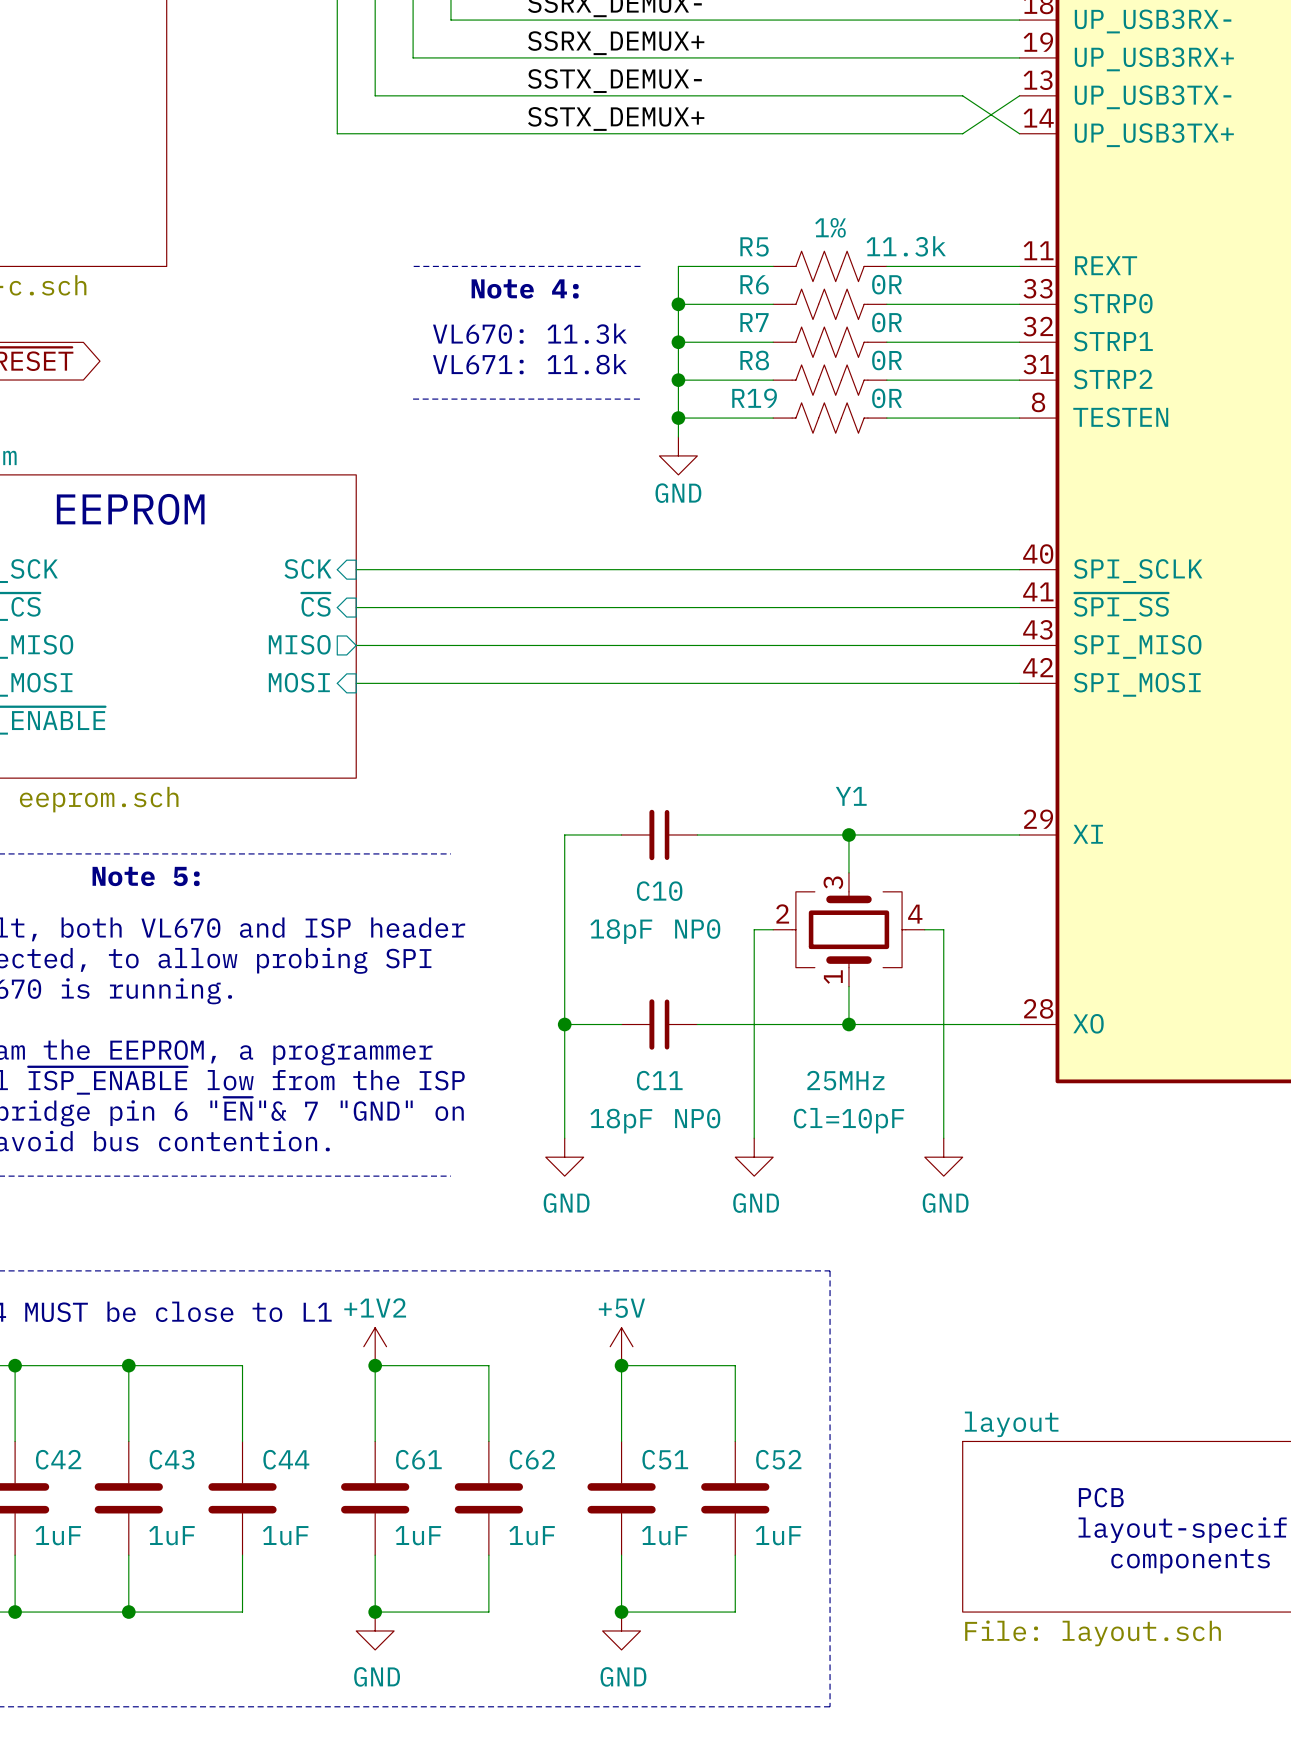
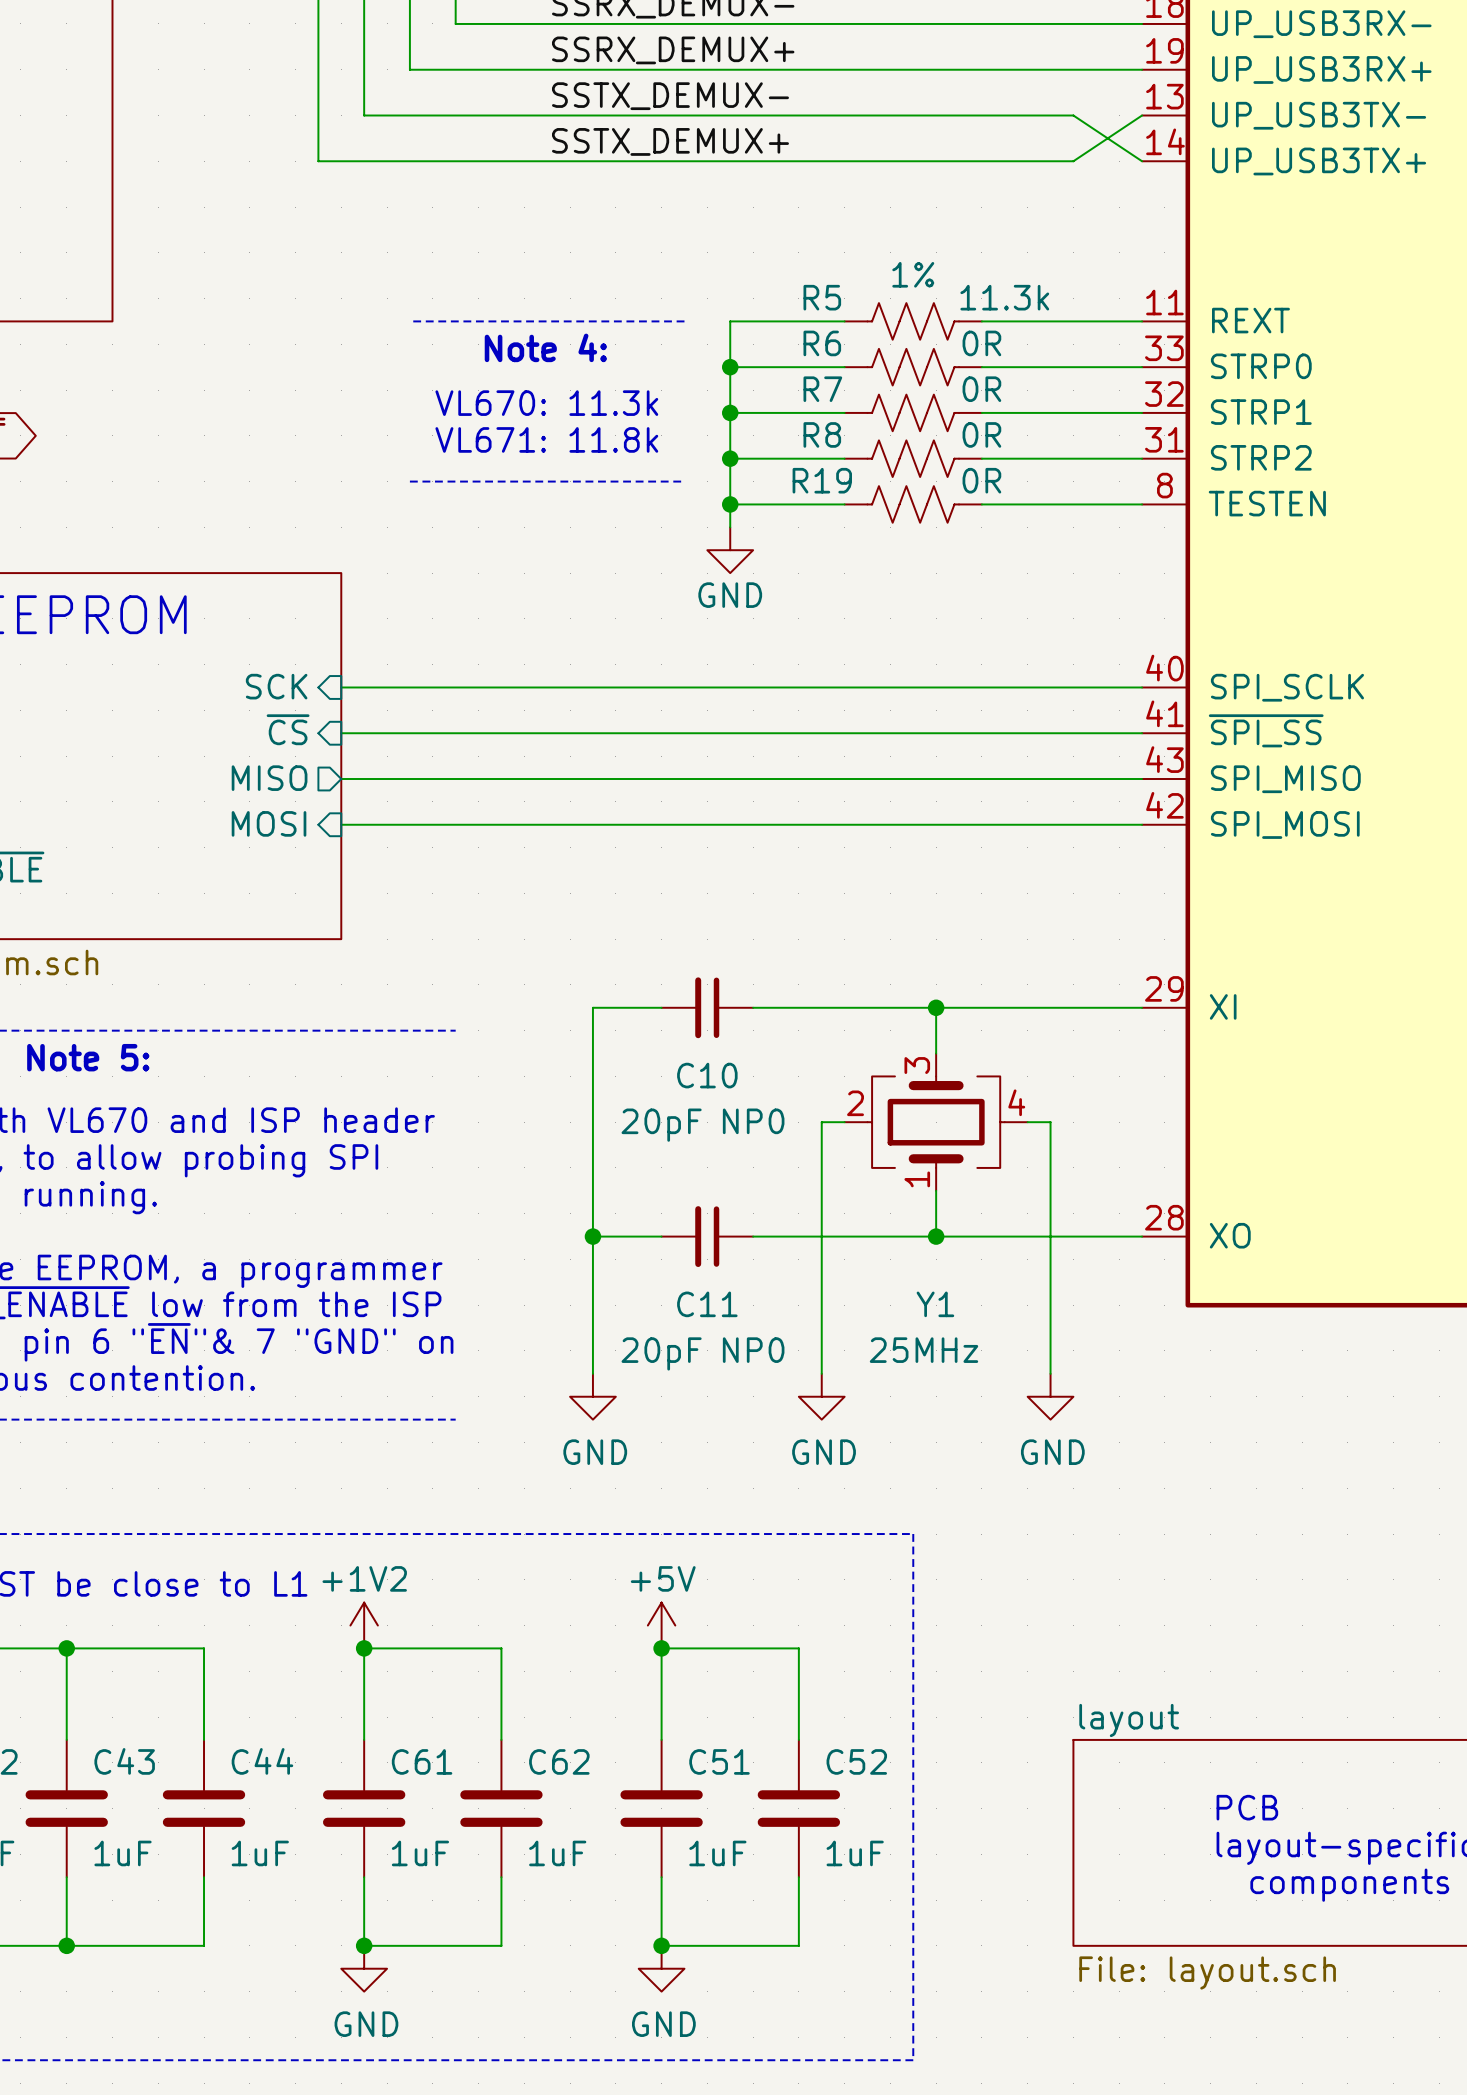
Y1 name position: Y1 (851, 796) -> Y1 (935, 1304)
C10 value: 18pF (621, 931) -> 20pF (661, 1125)
Y1 value position: 25MHz (845, 1080) -> 25MHz (923, 1350)
Y1 text: Cl=10pF (848, 1120) -> none
C11 value: 18pF (621, 1121) -> 20pF (661, 1353)

